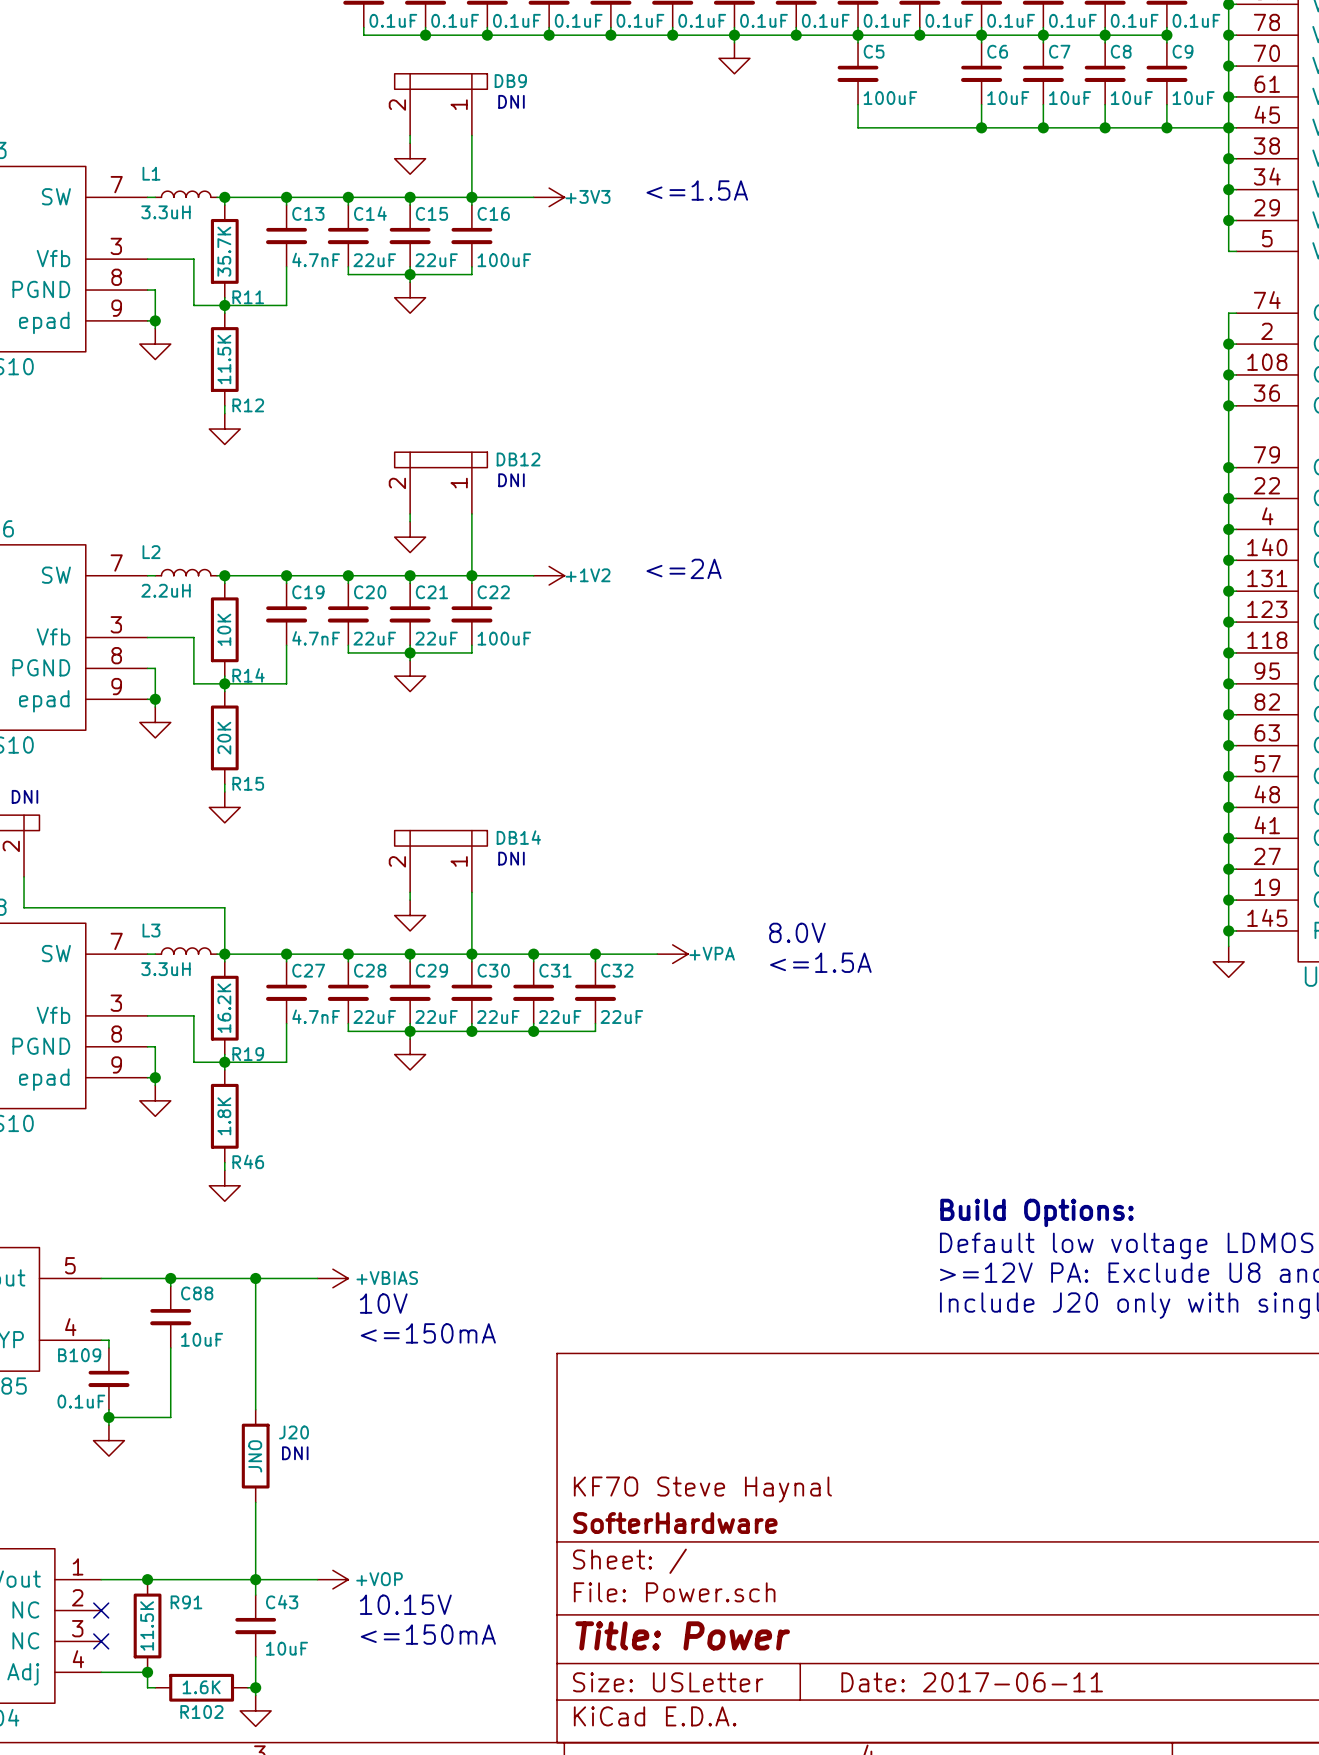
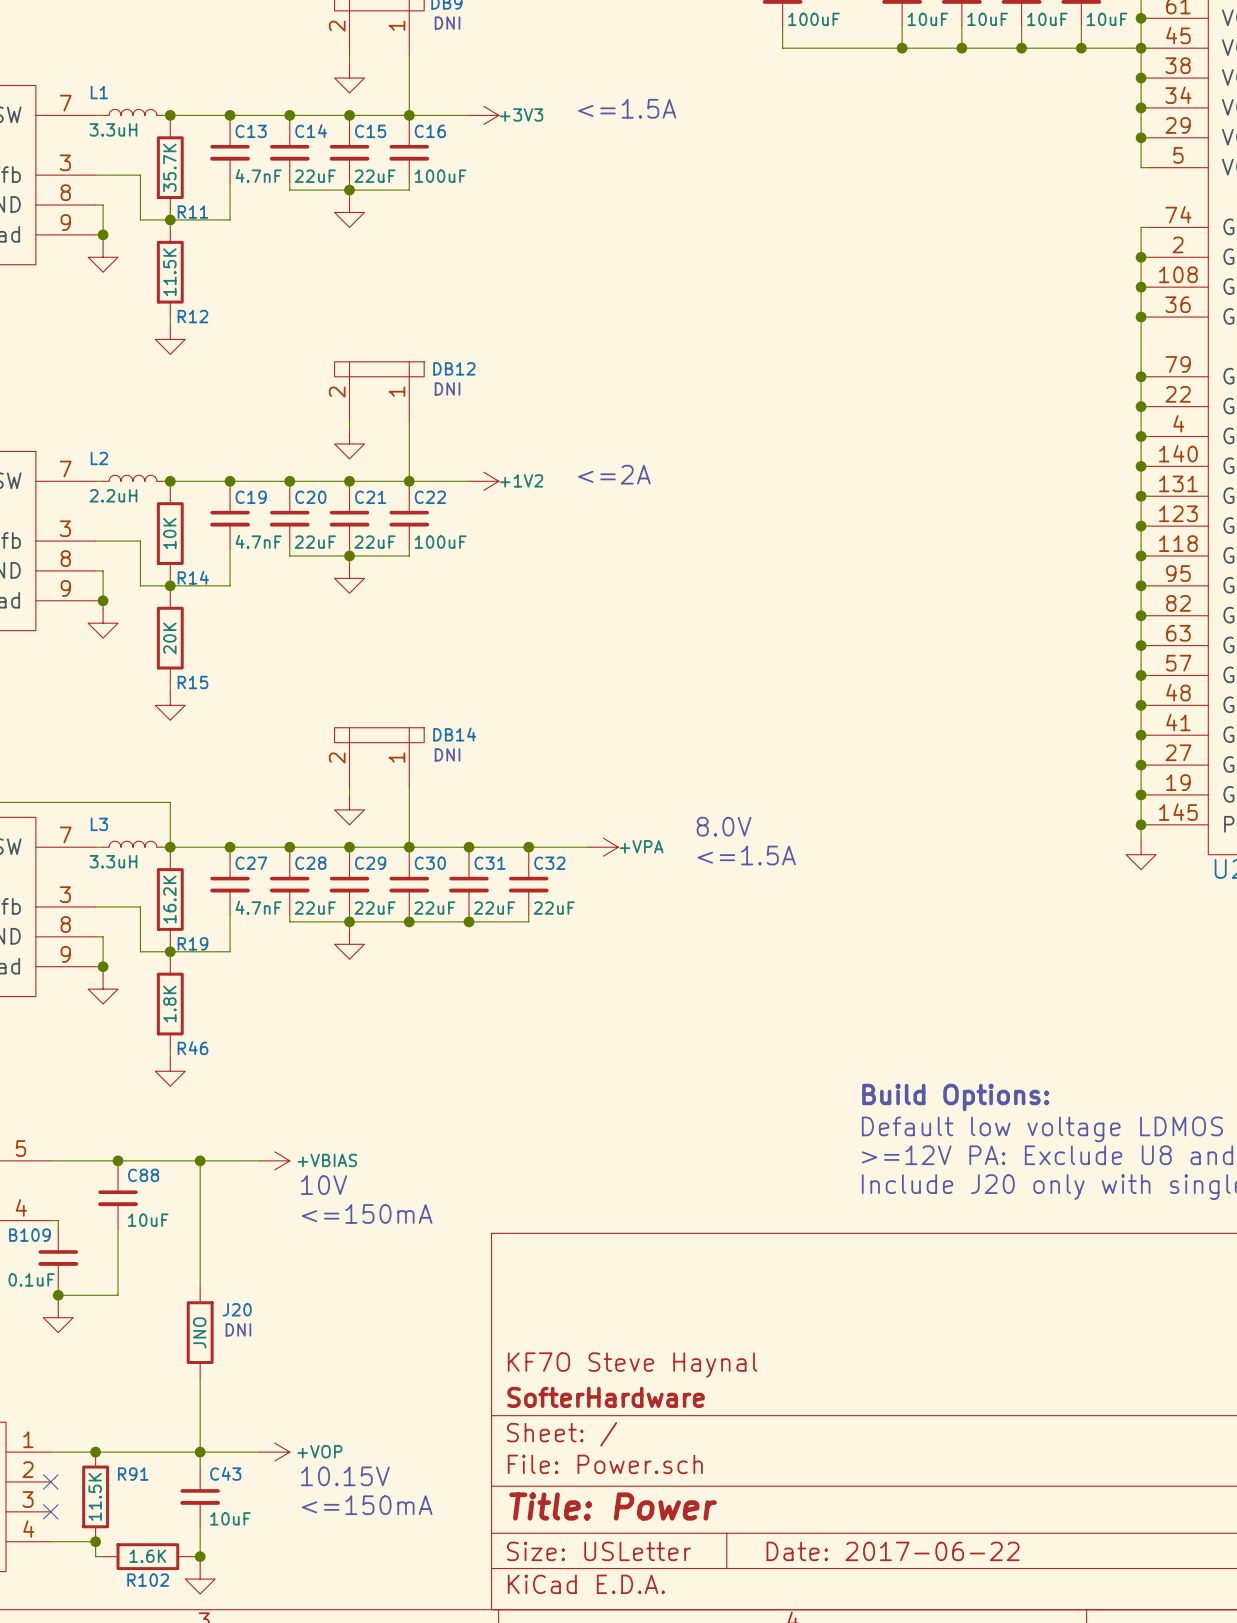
title block: Date: 2017-06-11 (972, 1682) -> Date: 2017-06-22 (893, 1551)

